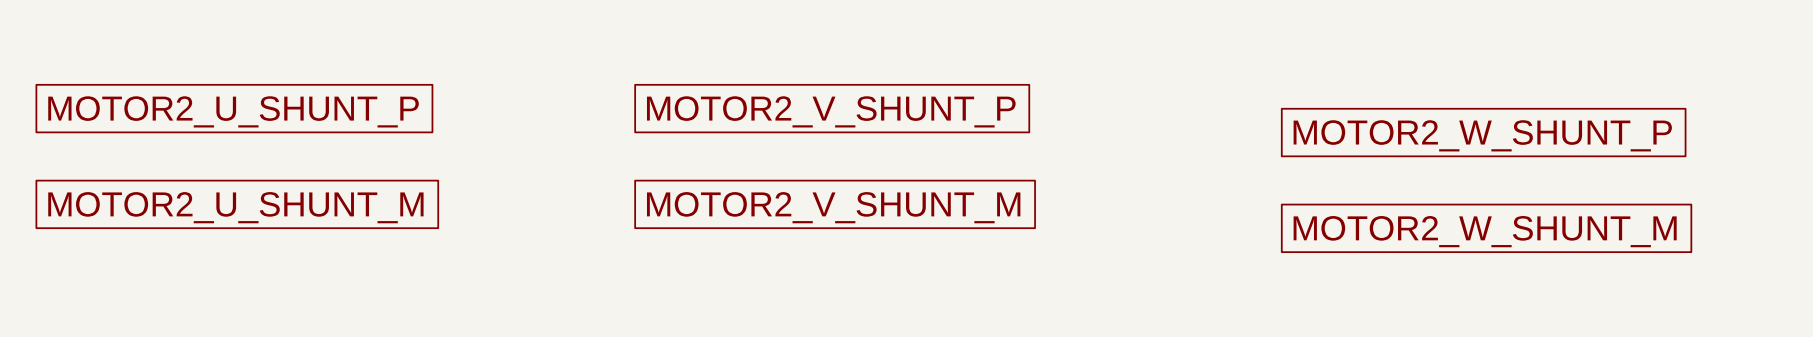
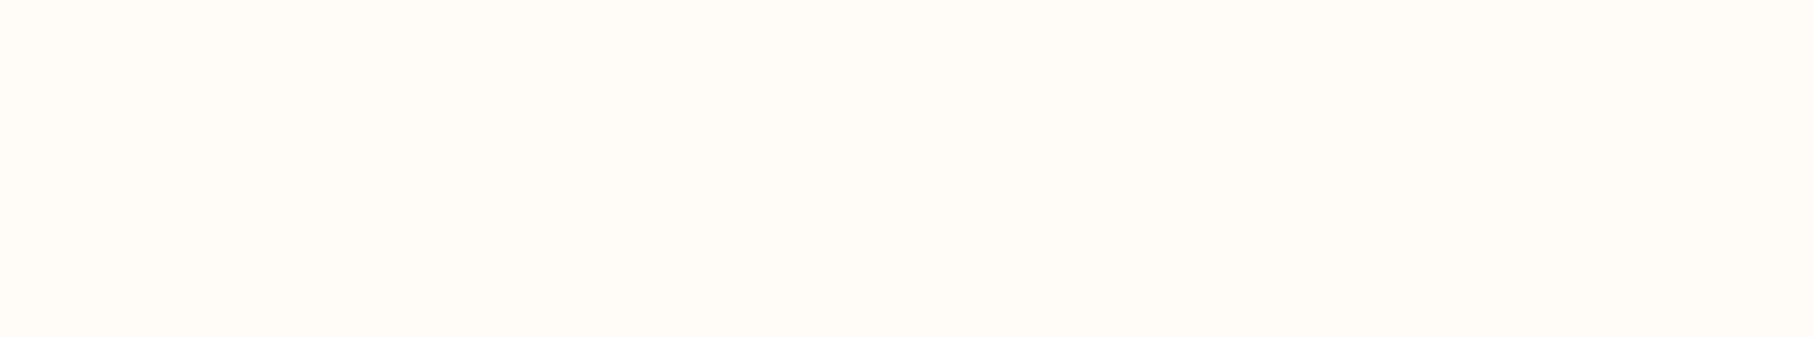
global label: MOTOR2_U_SHUNT_P (233, 111) -> none
global label: MOTOR2_V_SHUNT_P (831, 111) -> none
global label: MOTOR2_W_SHUNT_P (1482, 135) -> none
global label: MOTOR2_U_SHUNT_M (235, 207) -> none
global label: MOTOR2_V_SHUNT_M (833, 207) -> none
global label: MOTOR2_W_SHUNT_M (1485, 231) -> none

